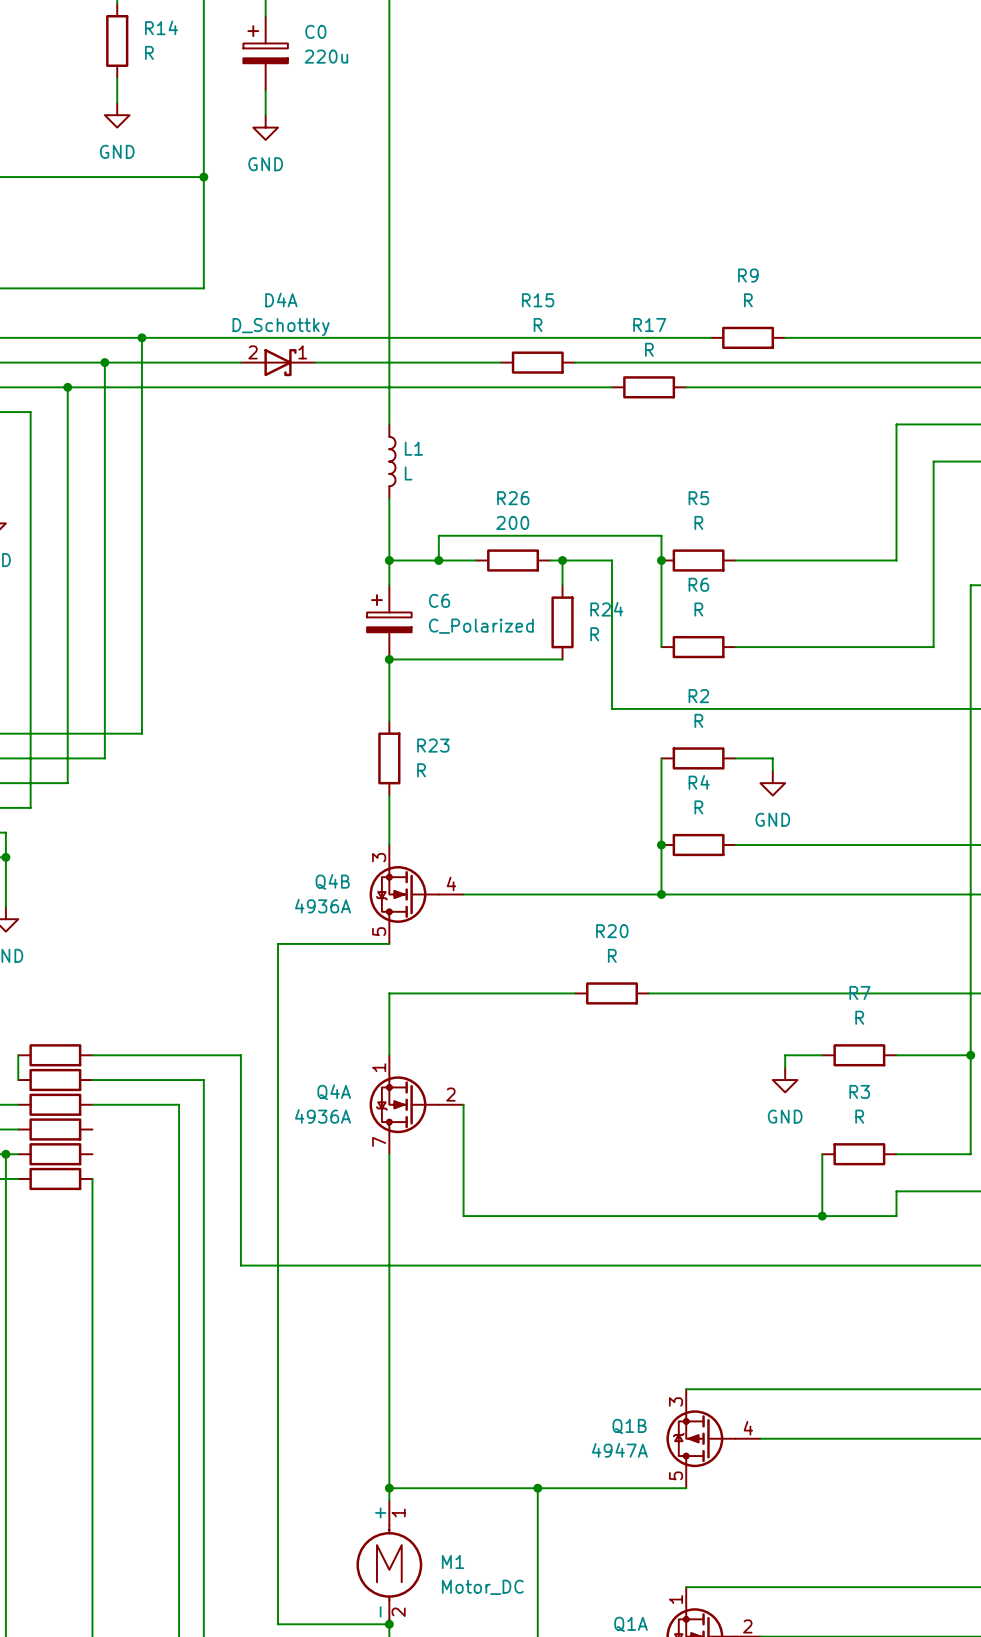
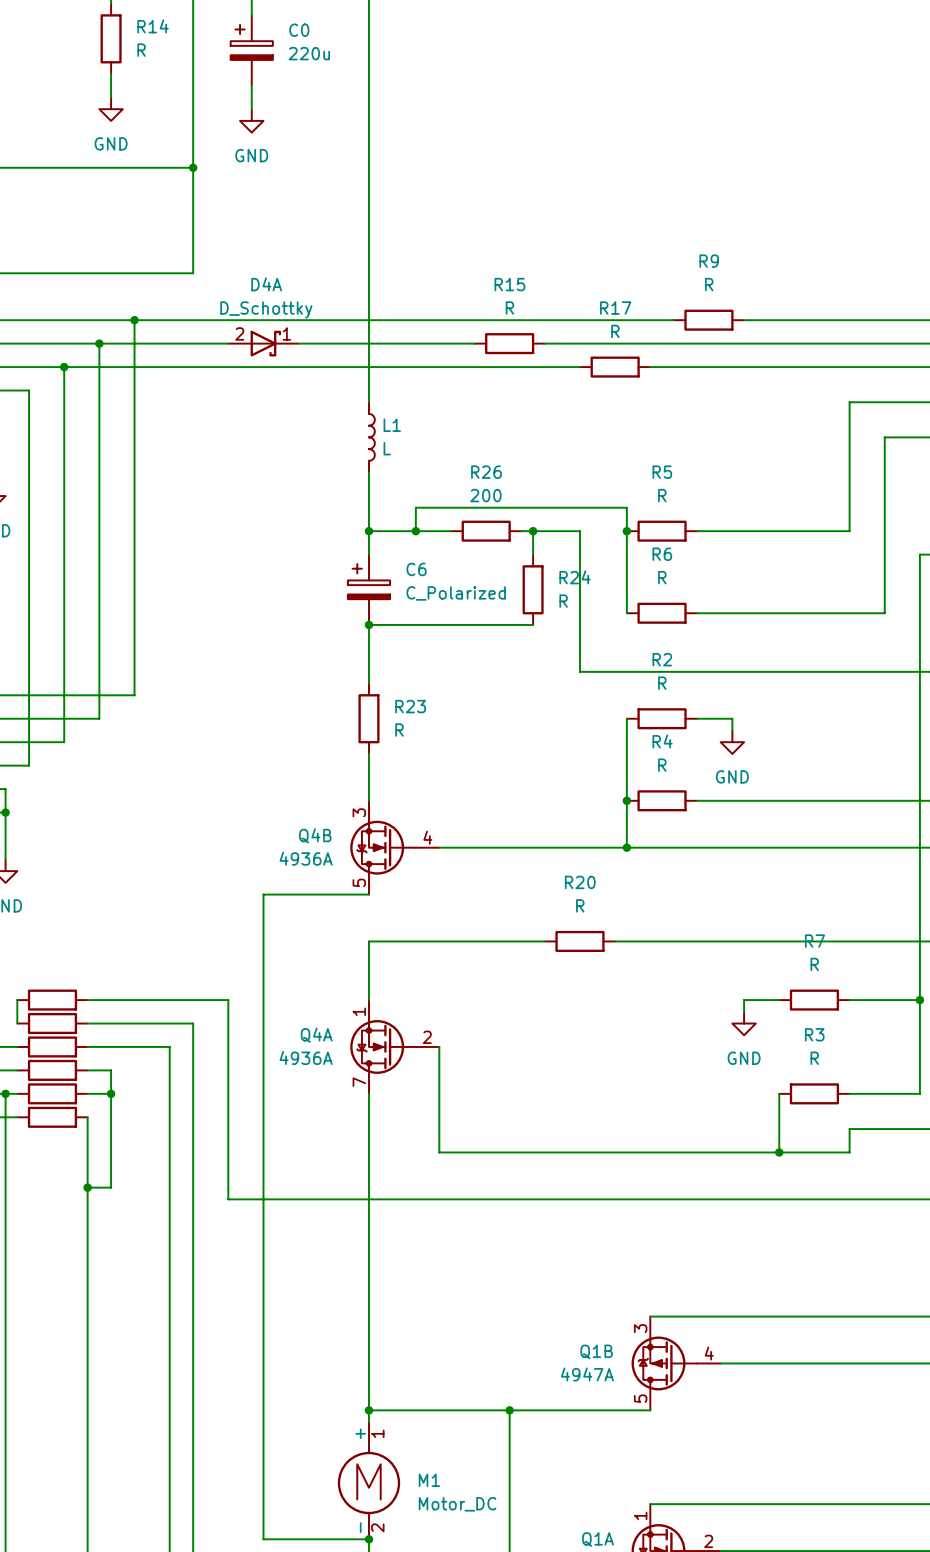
wire: none -> (87, 1070) (111, 1070) (111, 1187) (87, 1187)
wire: none -> (87, 1093) (111, 1093)
junction: none -> (111, 1093)
junction: none -> (87, 1187)

